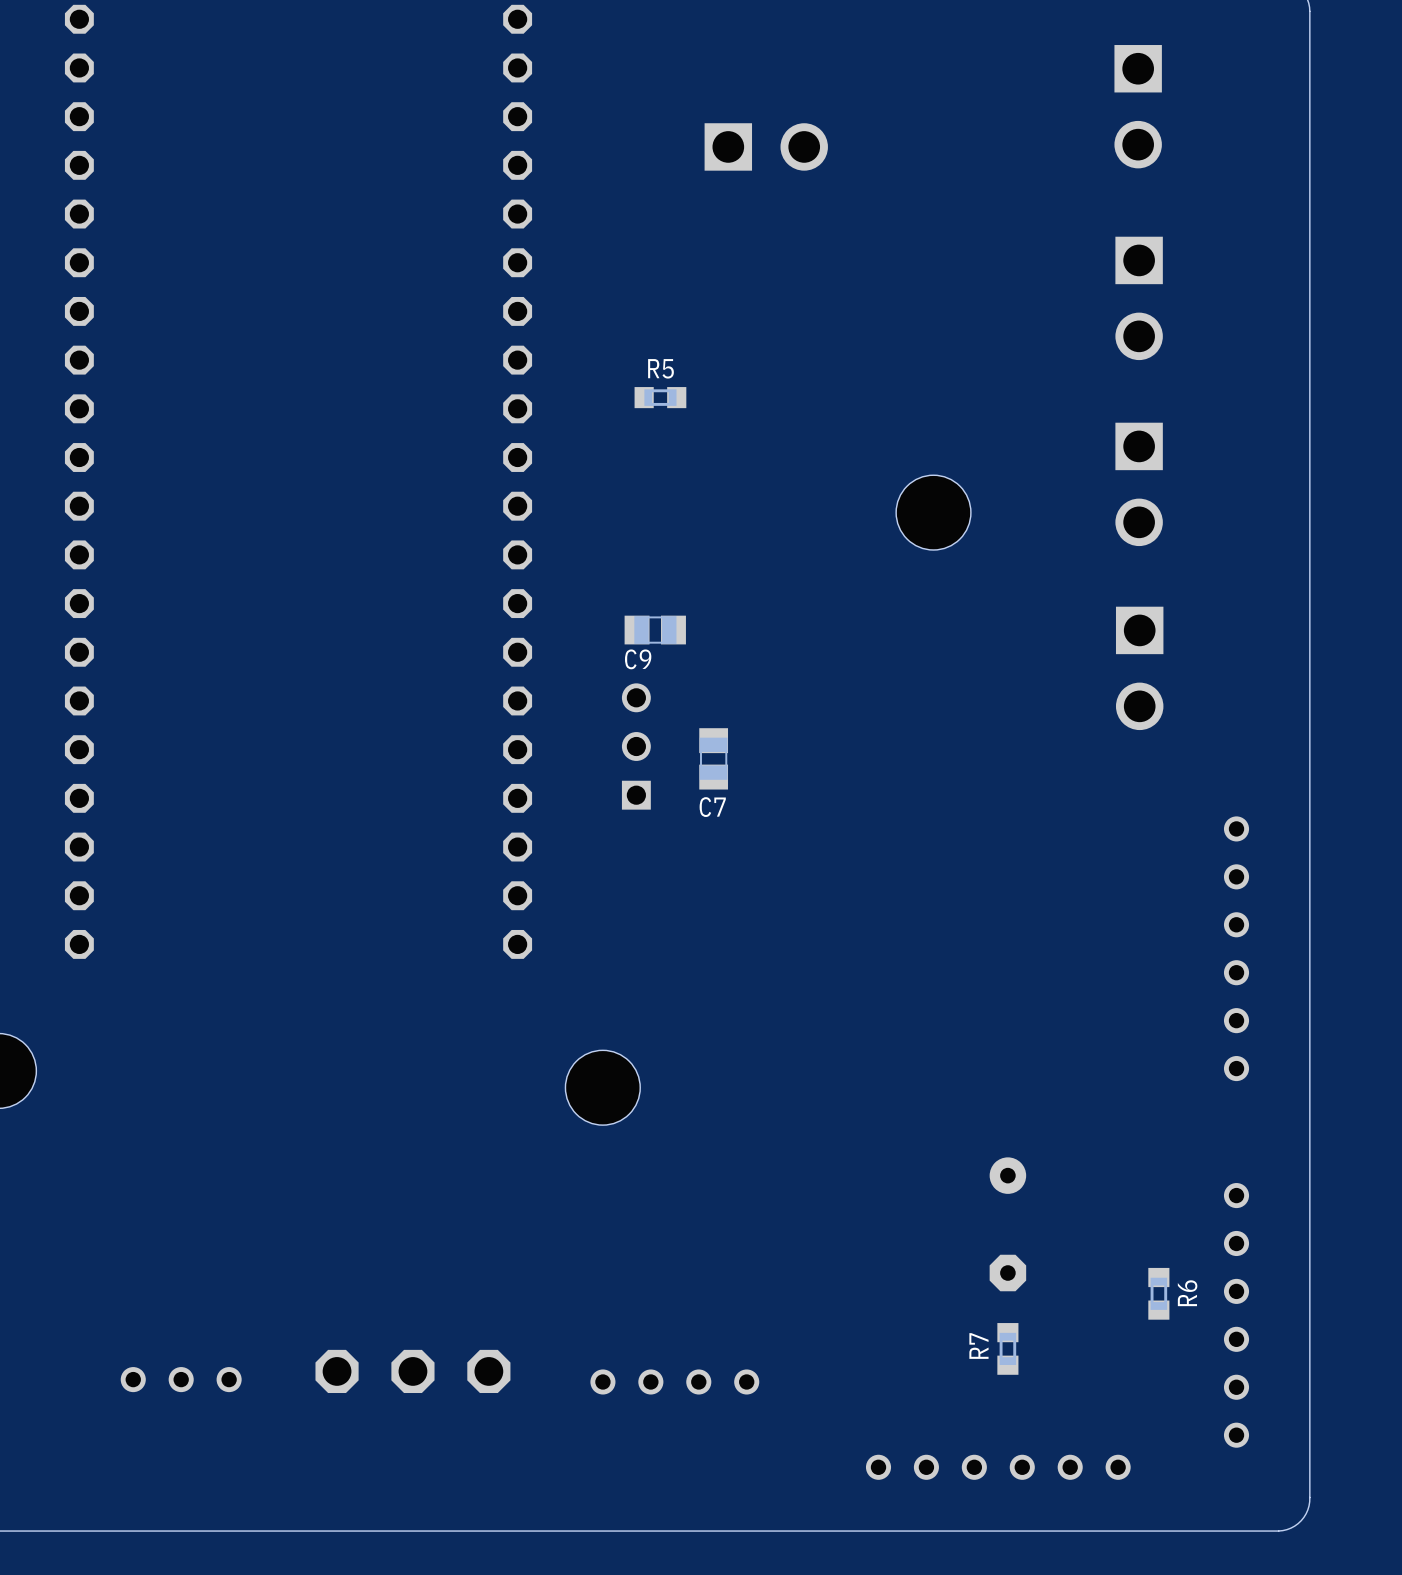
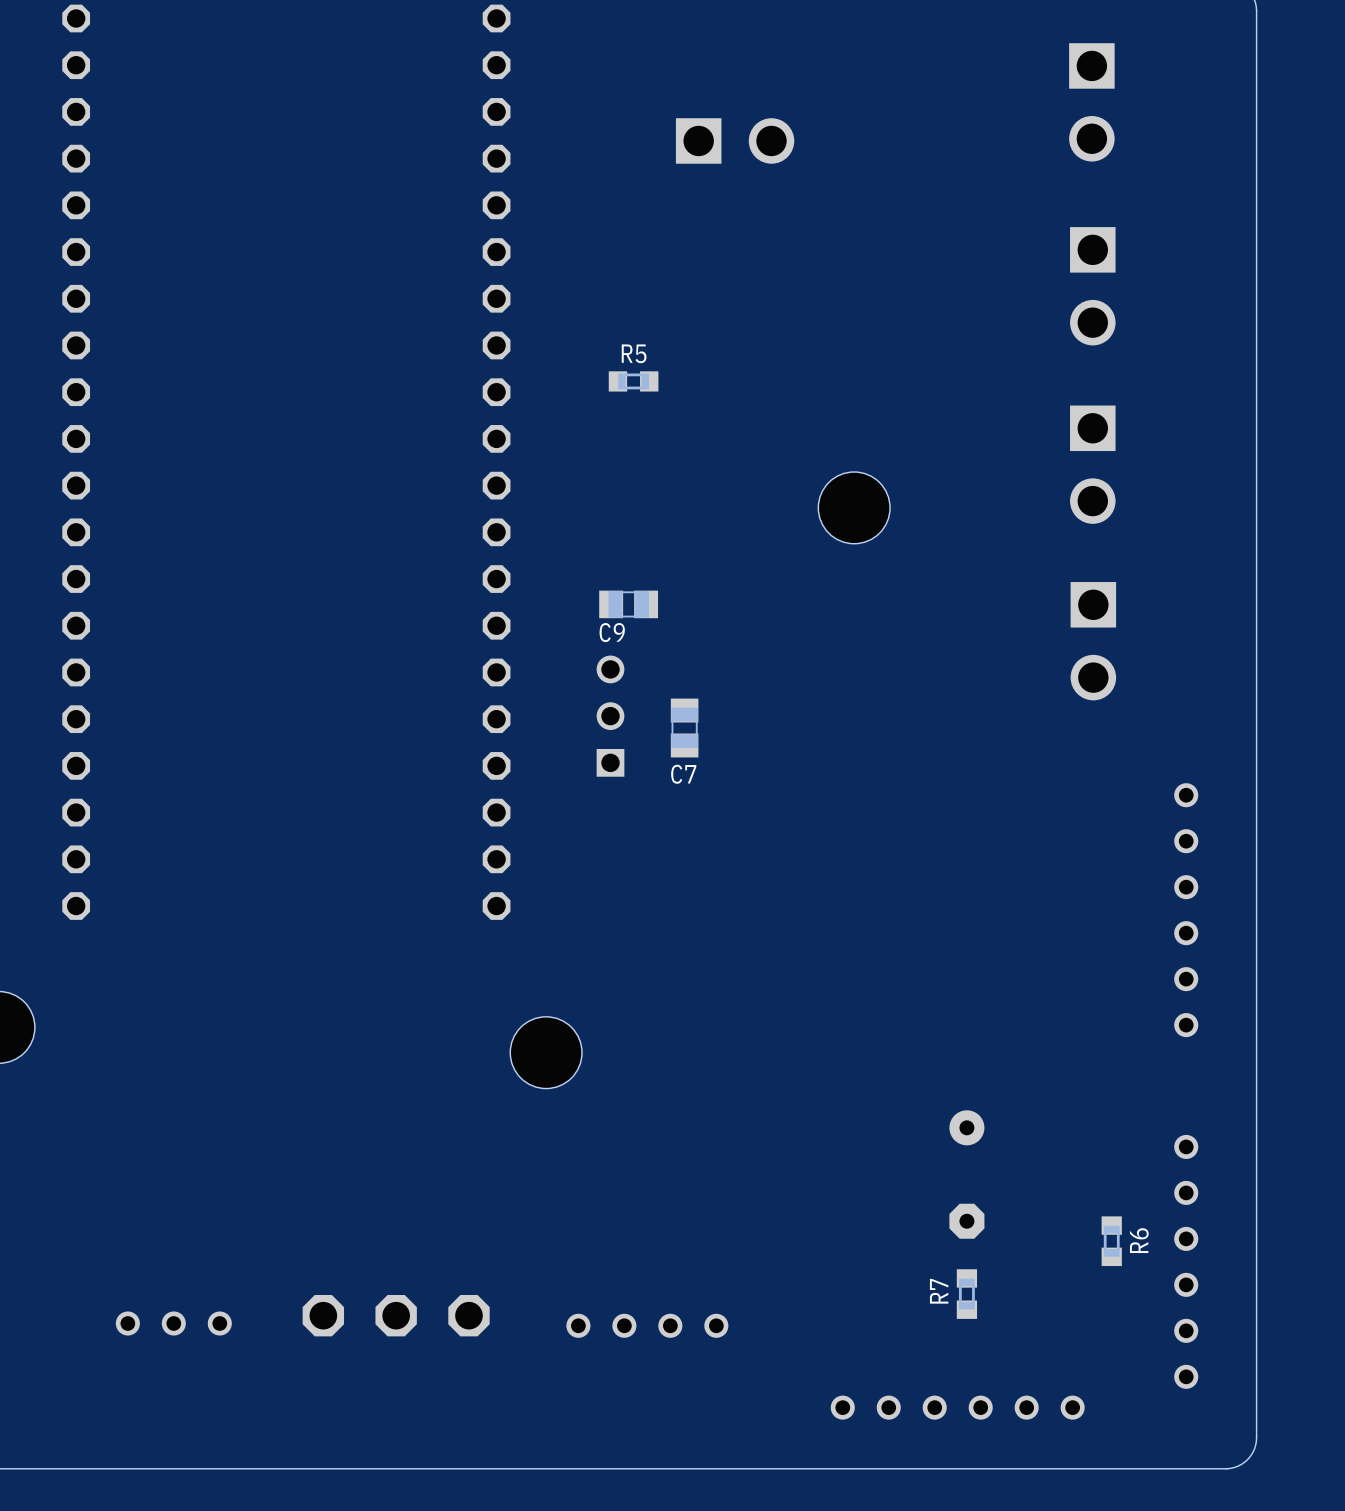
part position: (933, 512) -> (854, 507)
part position: (602, 1087) -> (546, 1052)

